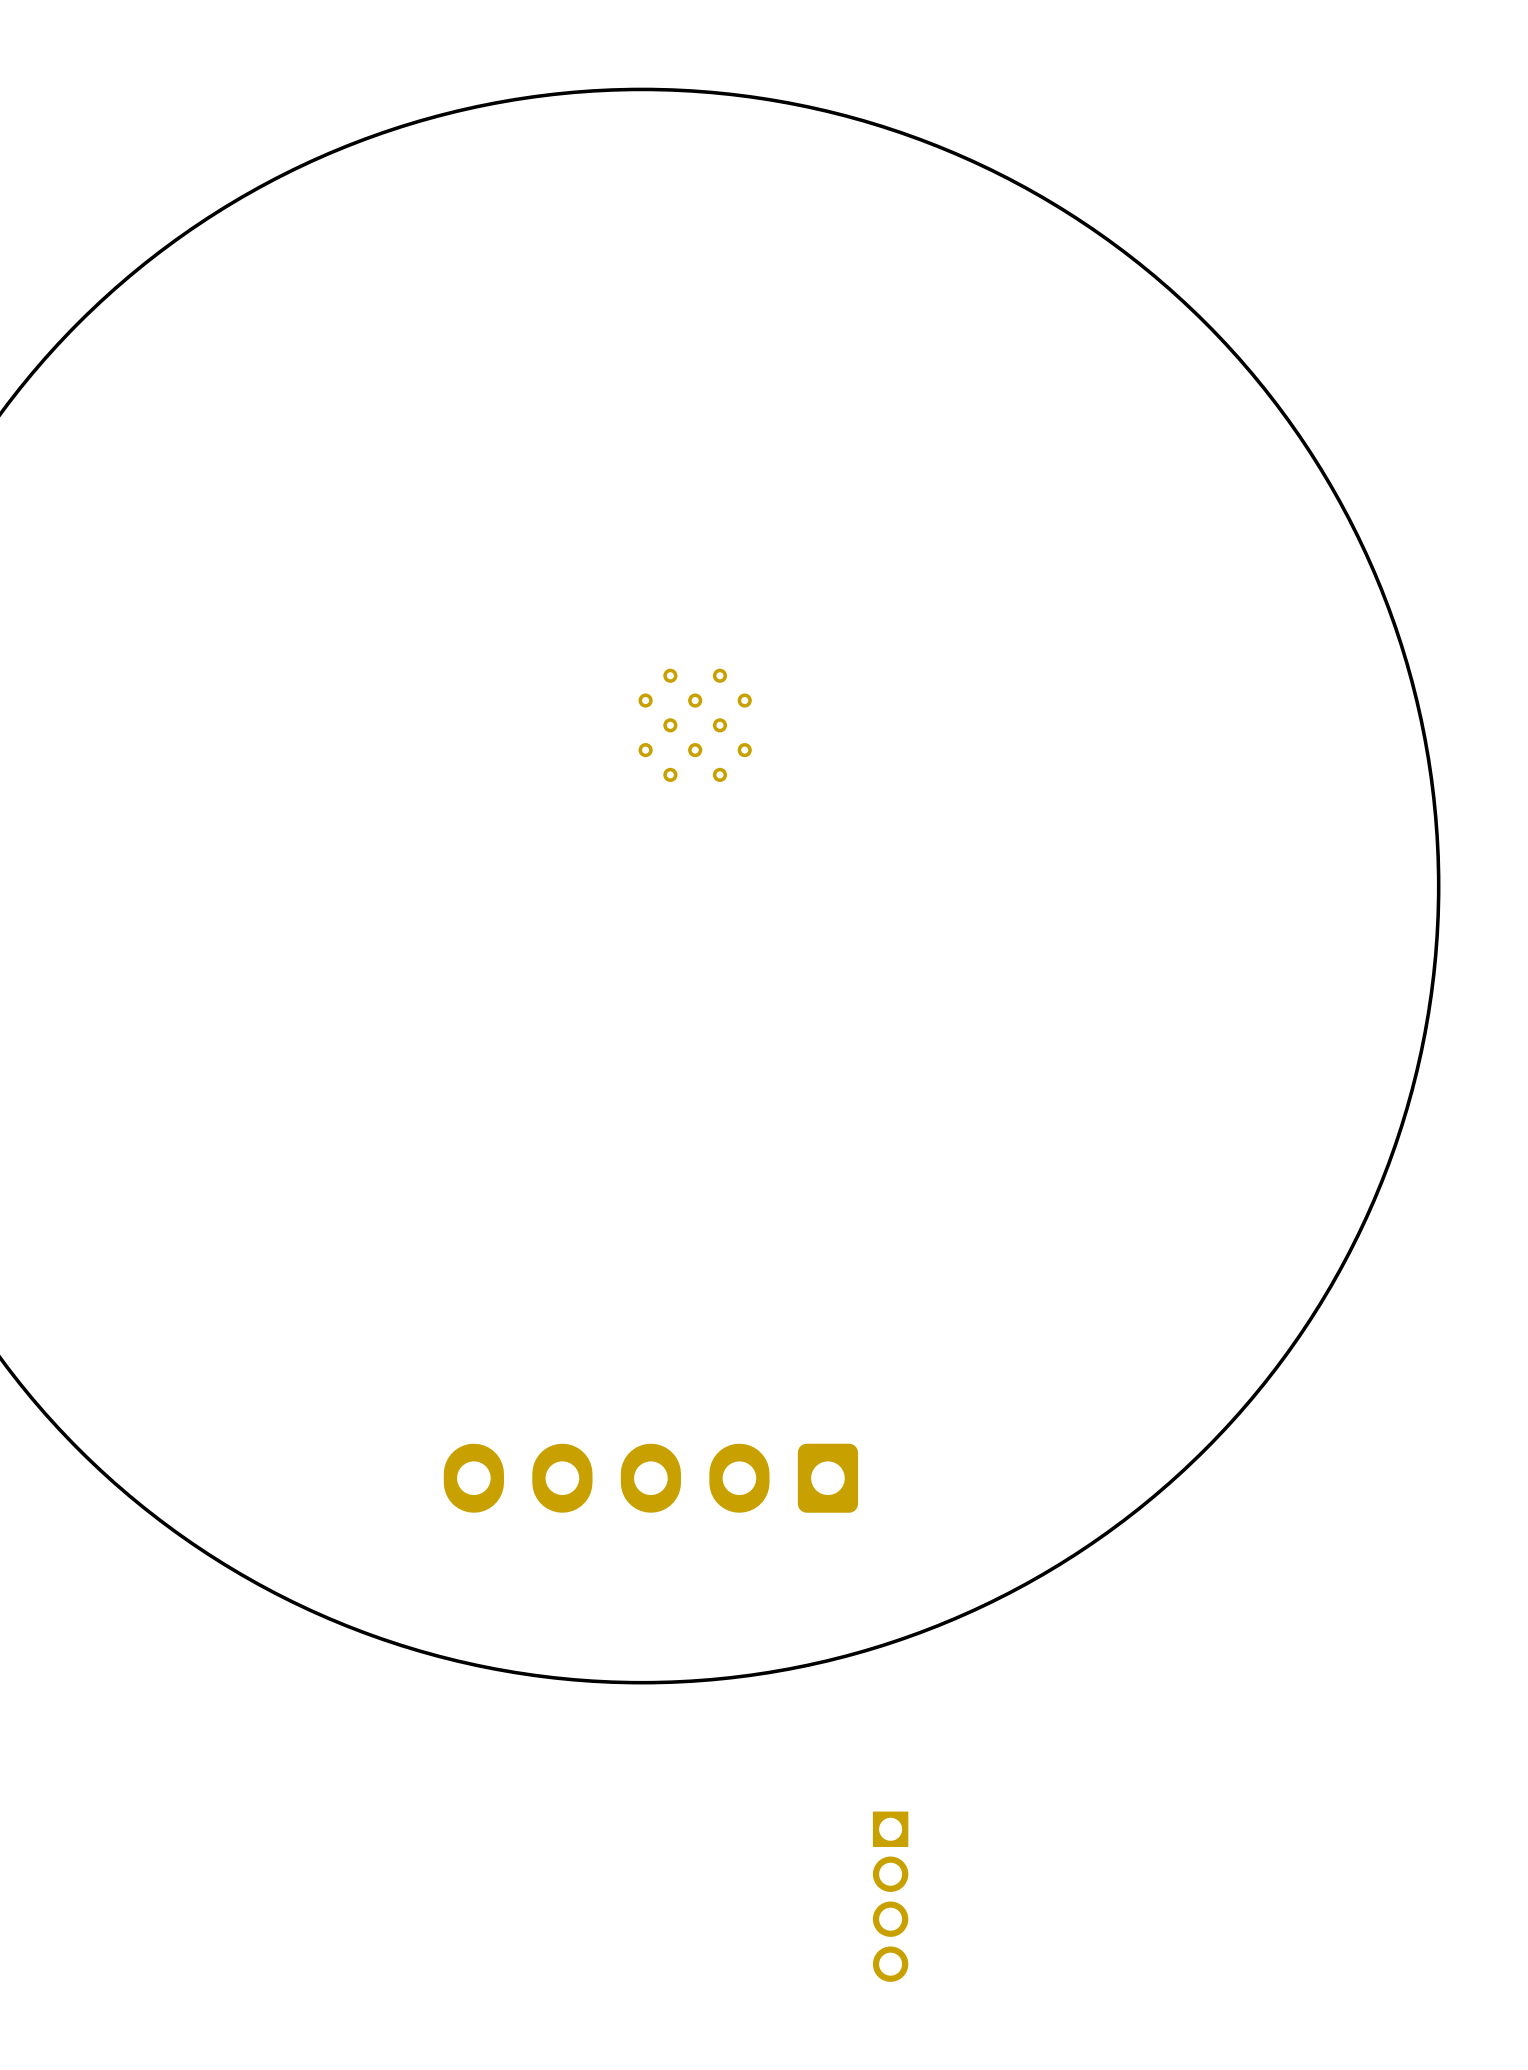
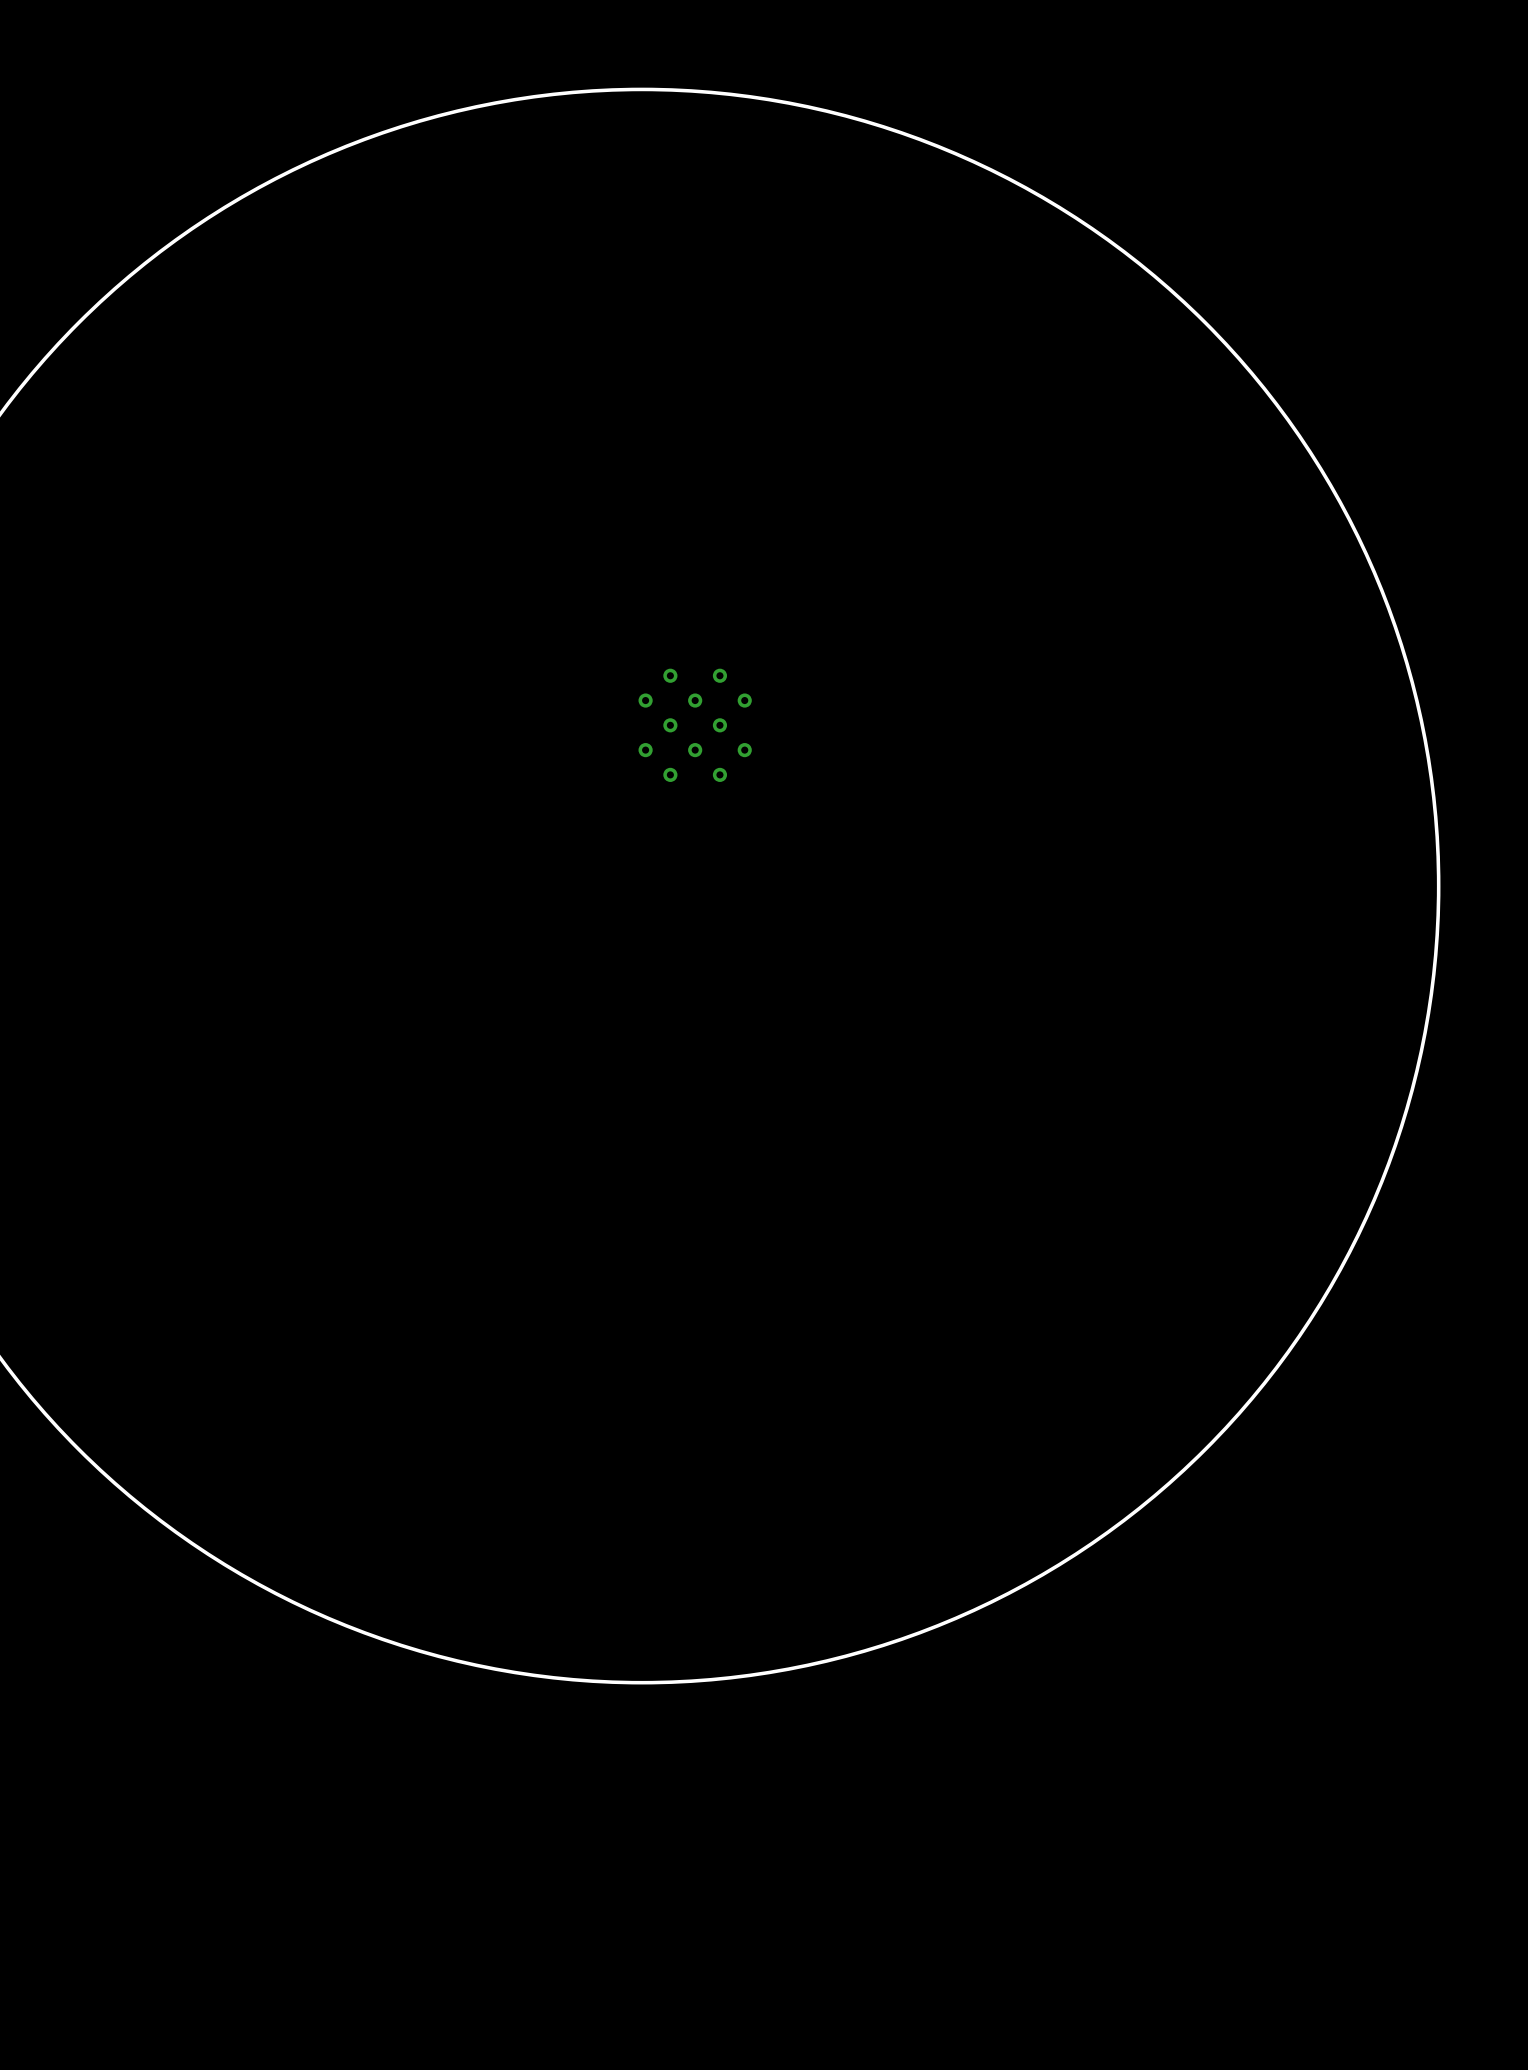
part: (650, 1478) -> none
part: (890, 1896) -> none

